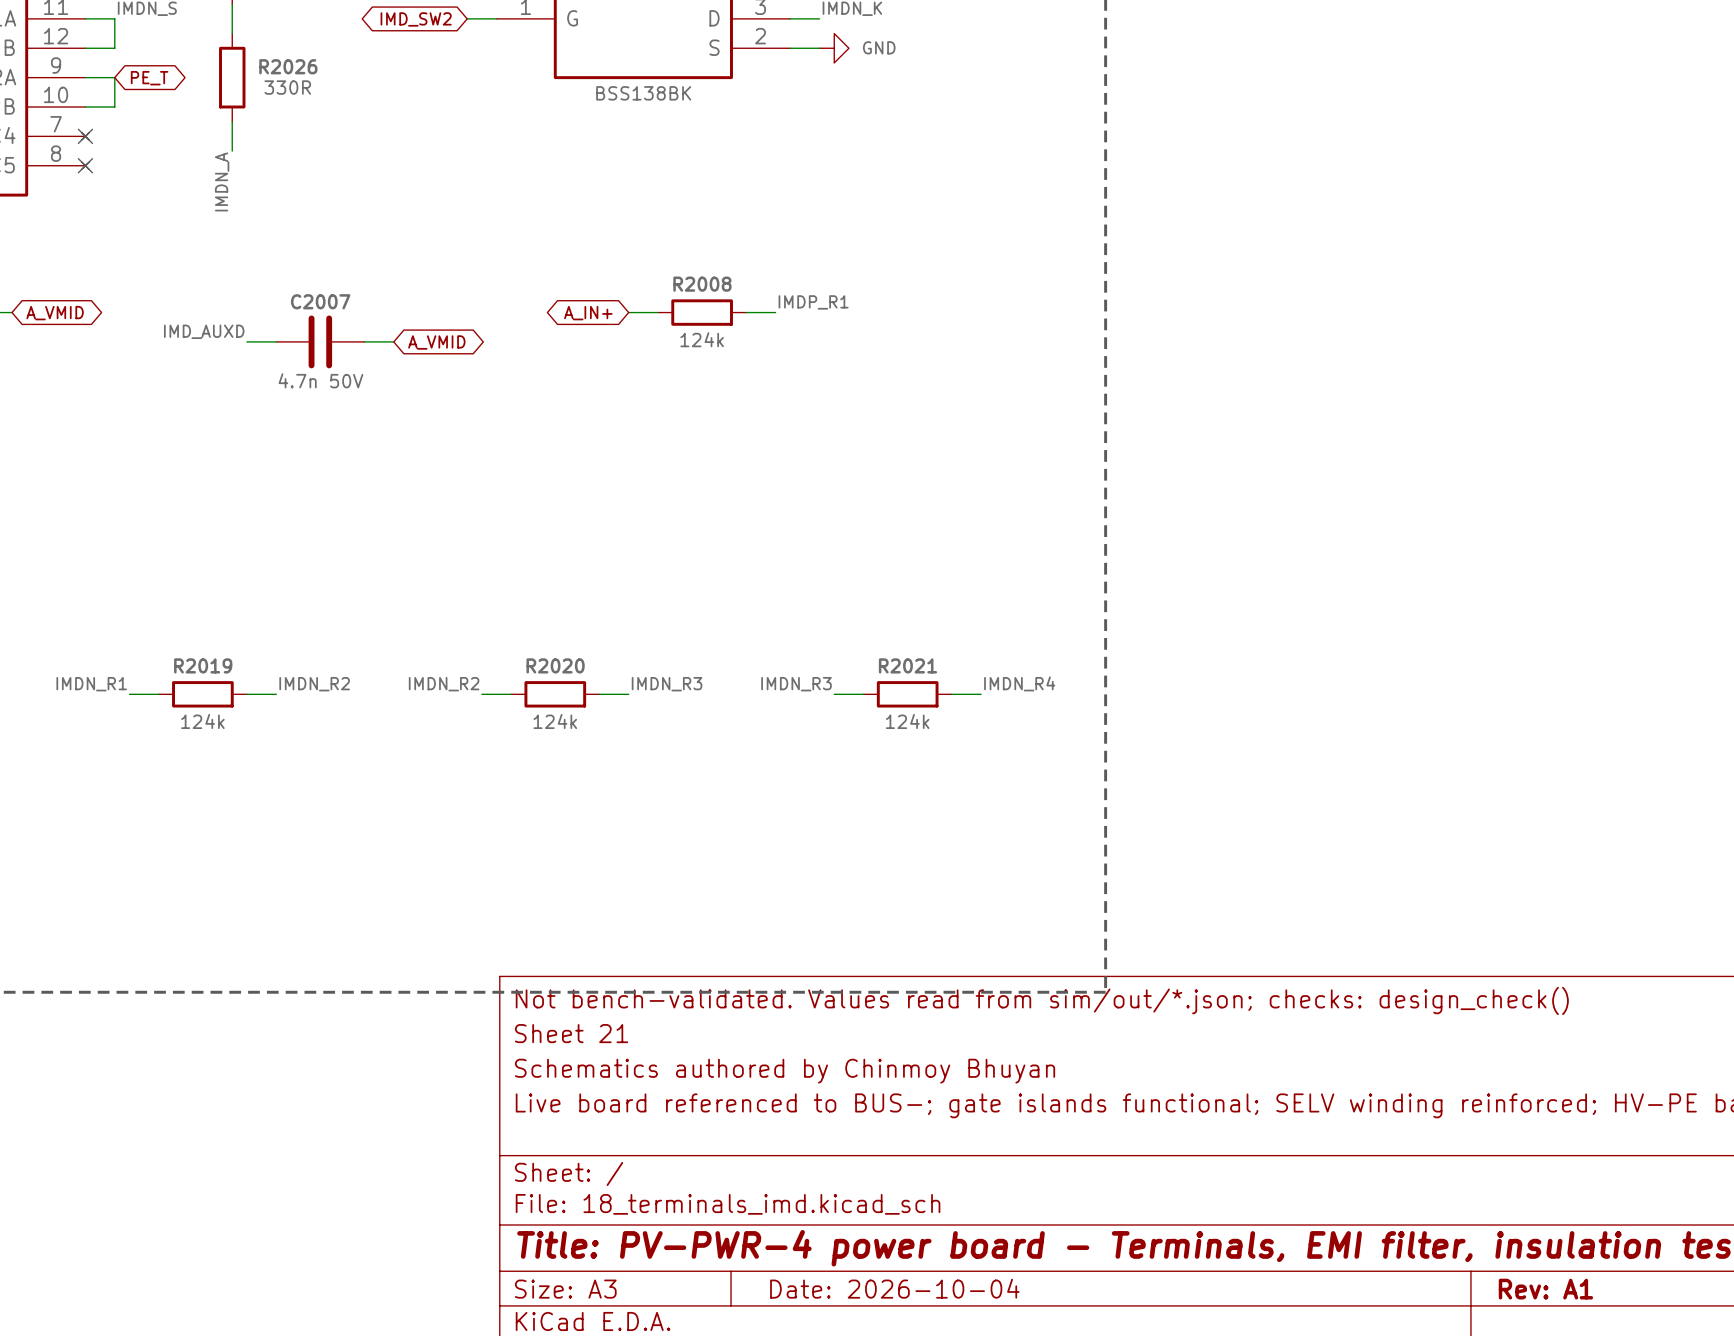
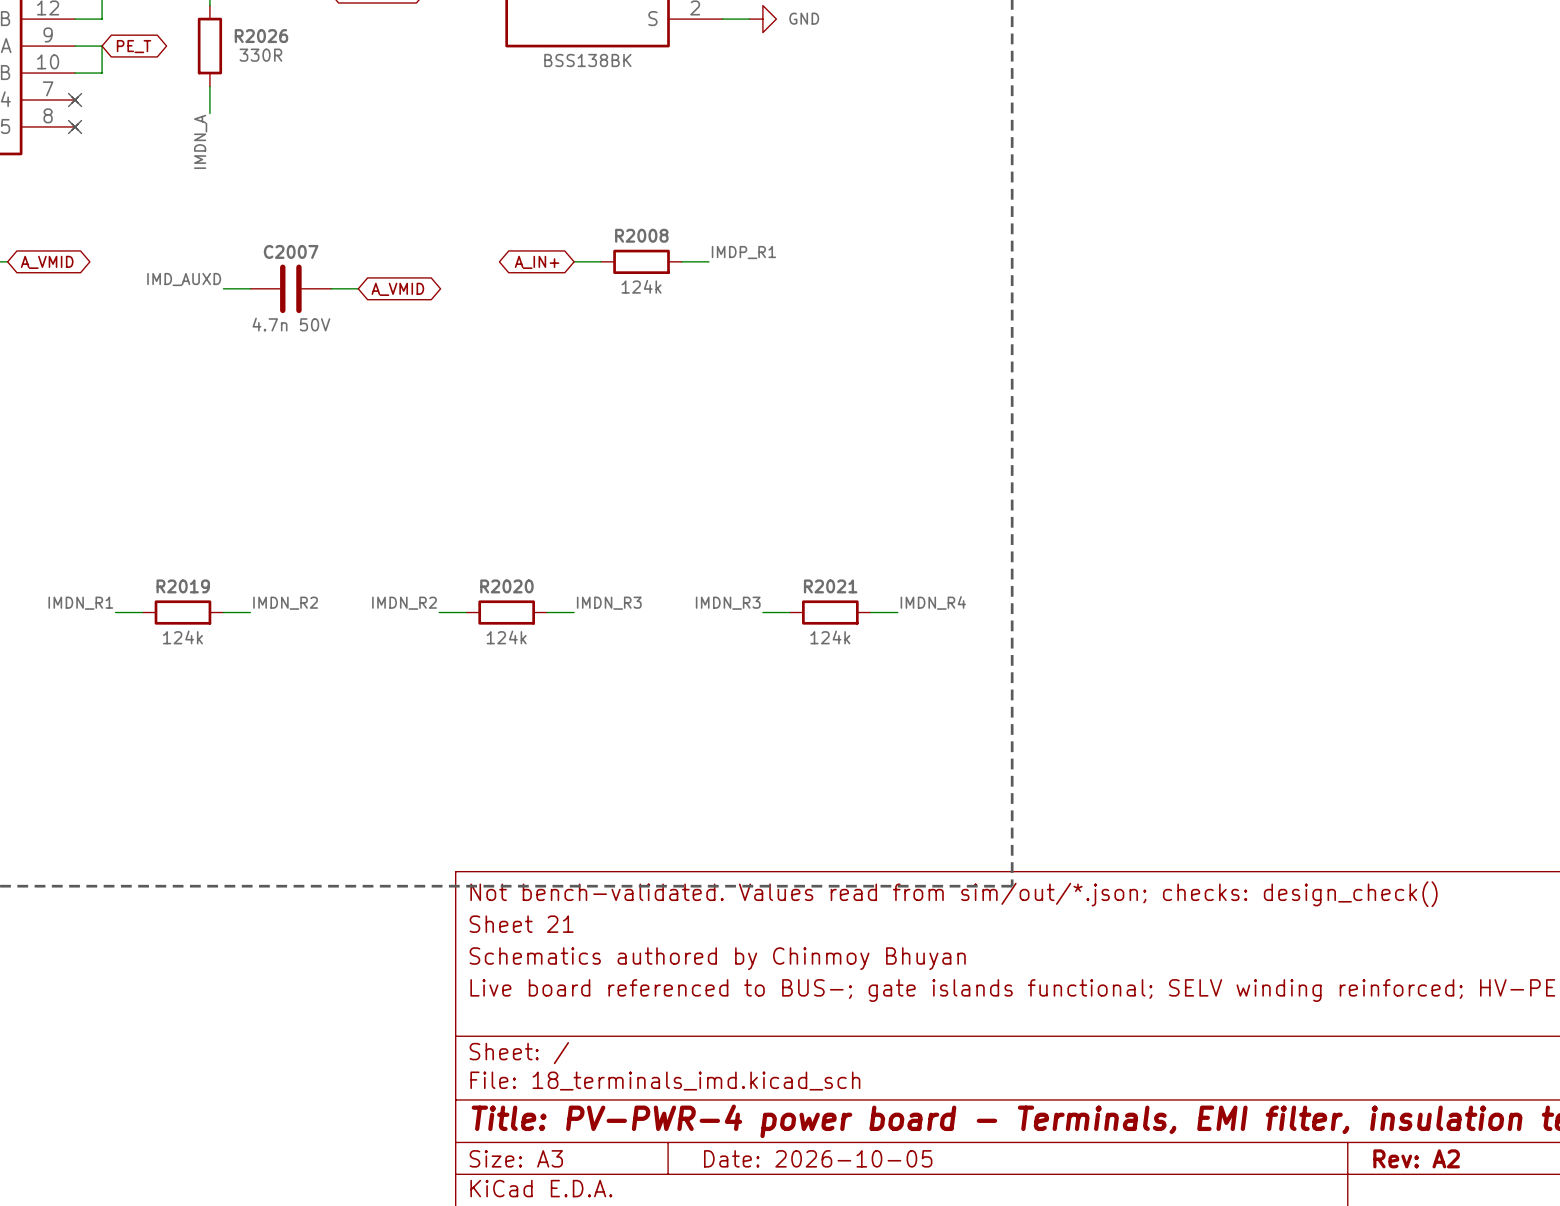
title block: Date: 2026-10-04 (894, 1288) -> Date: 2026-10-05 (818, 1158)
title block: Rev: A1 (1545, 1289) -> Rev: A2 (1416, 1158)

